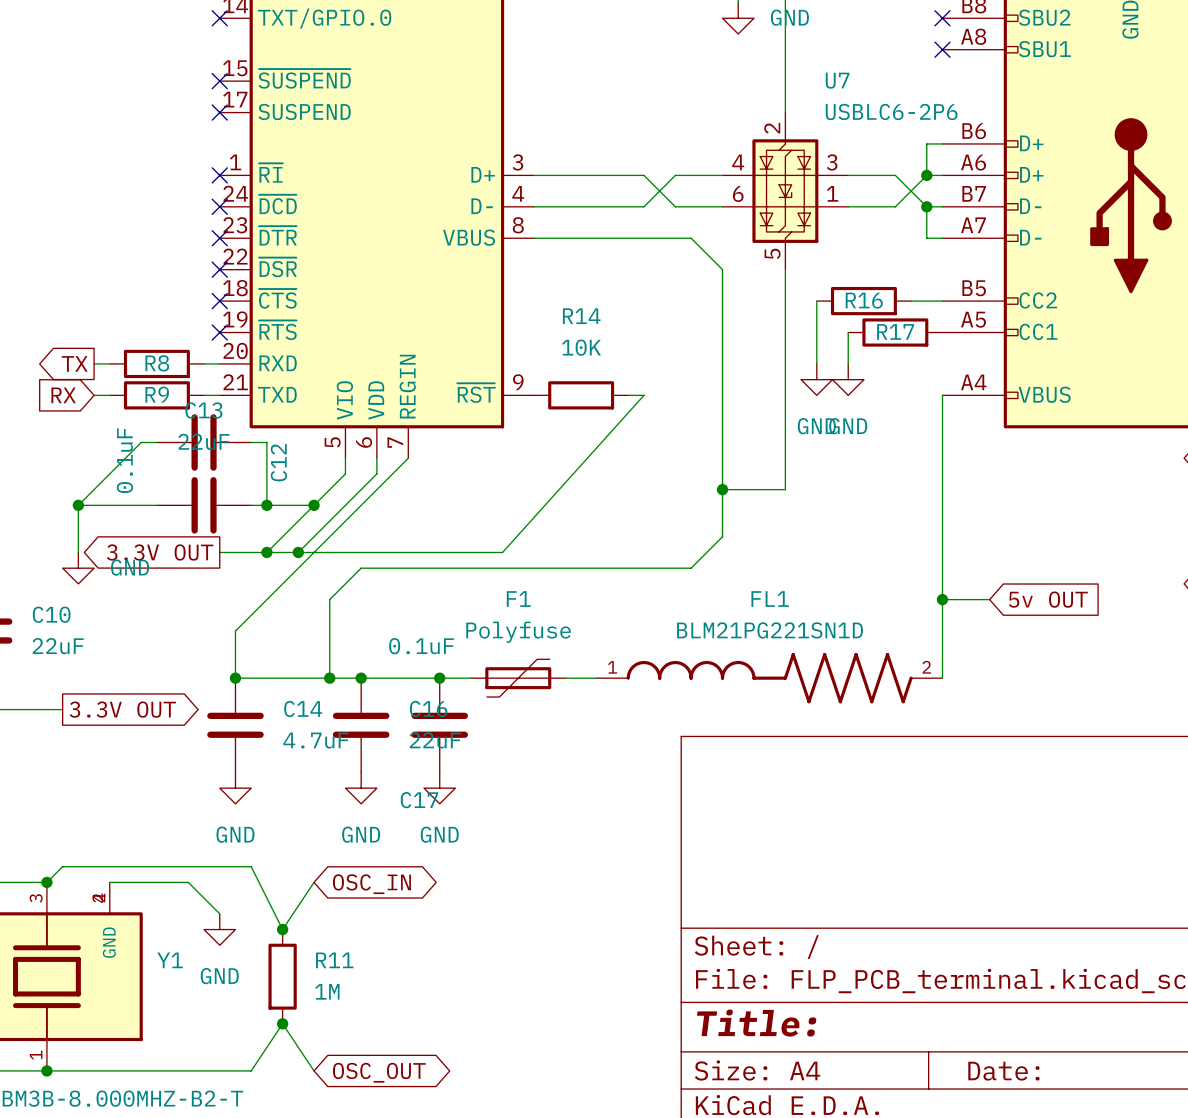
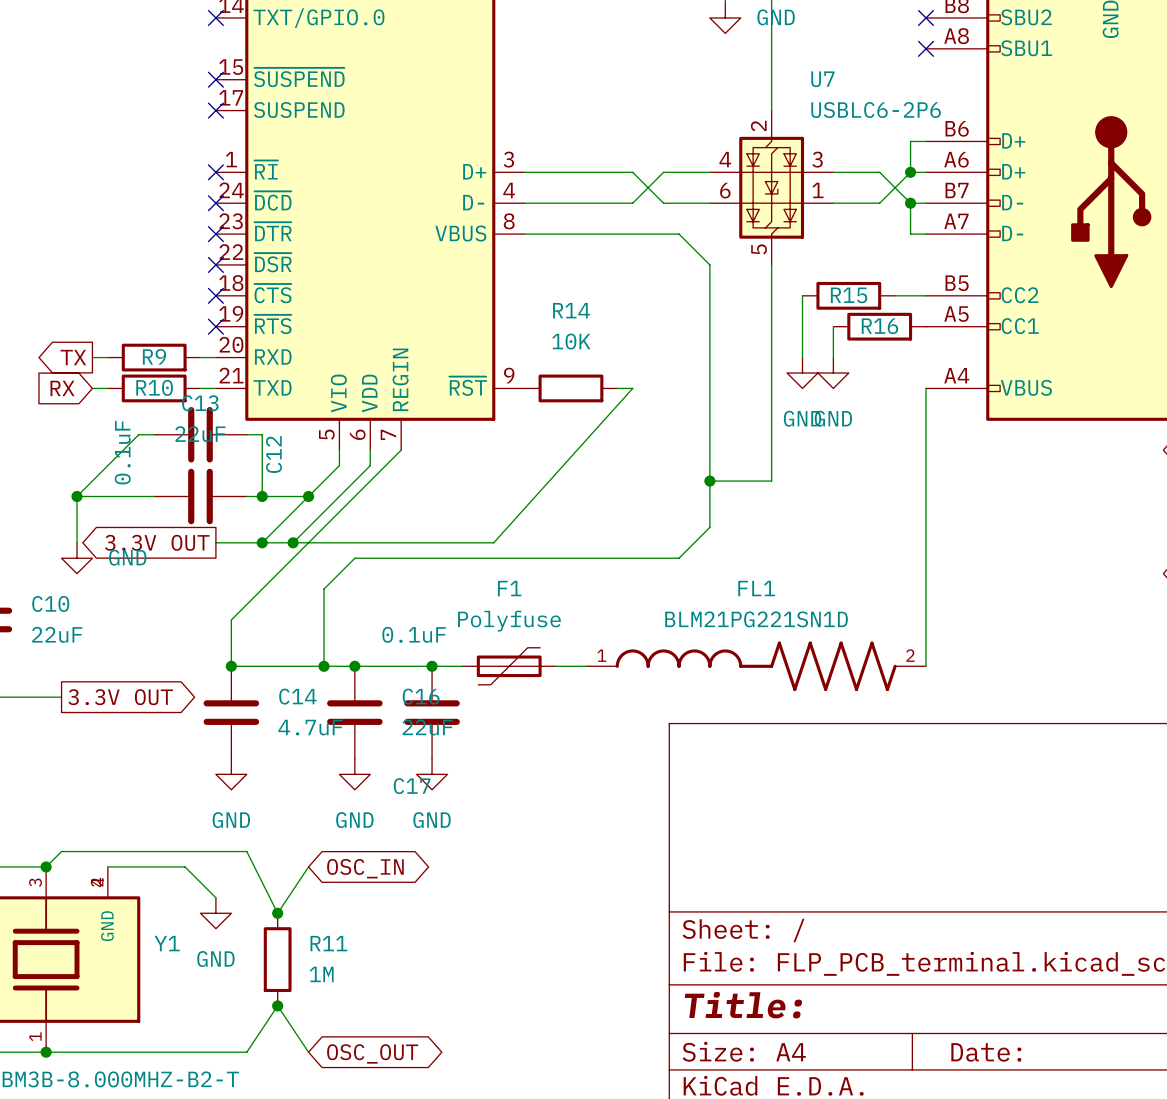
R16 name: R16 (864, 300) -> R15 (849, 295)
R17 name: R17 (895, 331) -> R16 (879, 326)
R8 name: R8 (157, 363) -> R9 (154, 356)
R9 name: R9 (157, 394) -> R10 (154, 387)
wire: (942, 599) (989, 599) -> none
junction: (942, 599) -> none
global label: 5v OUT (1048, 599) -> none

